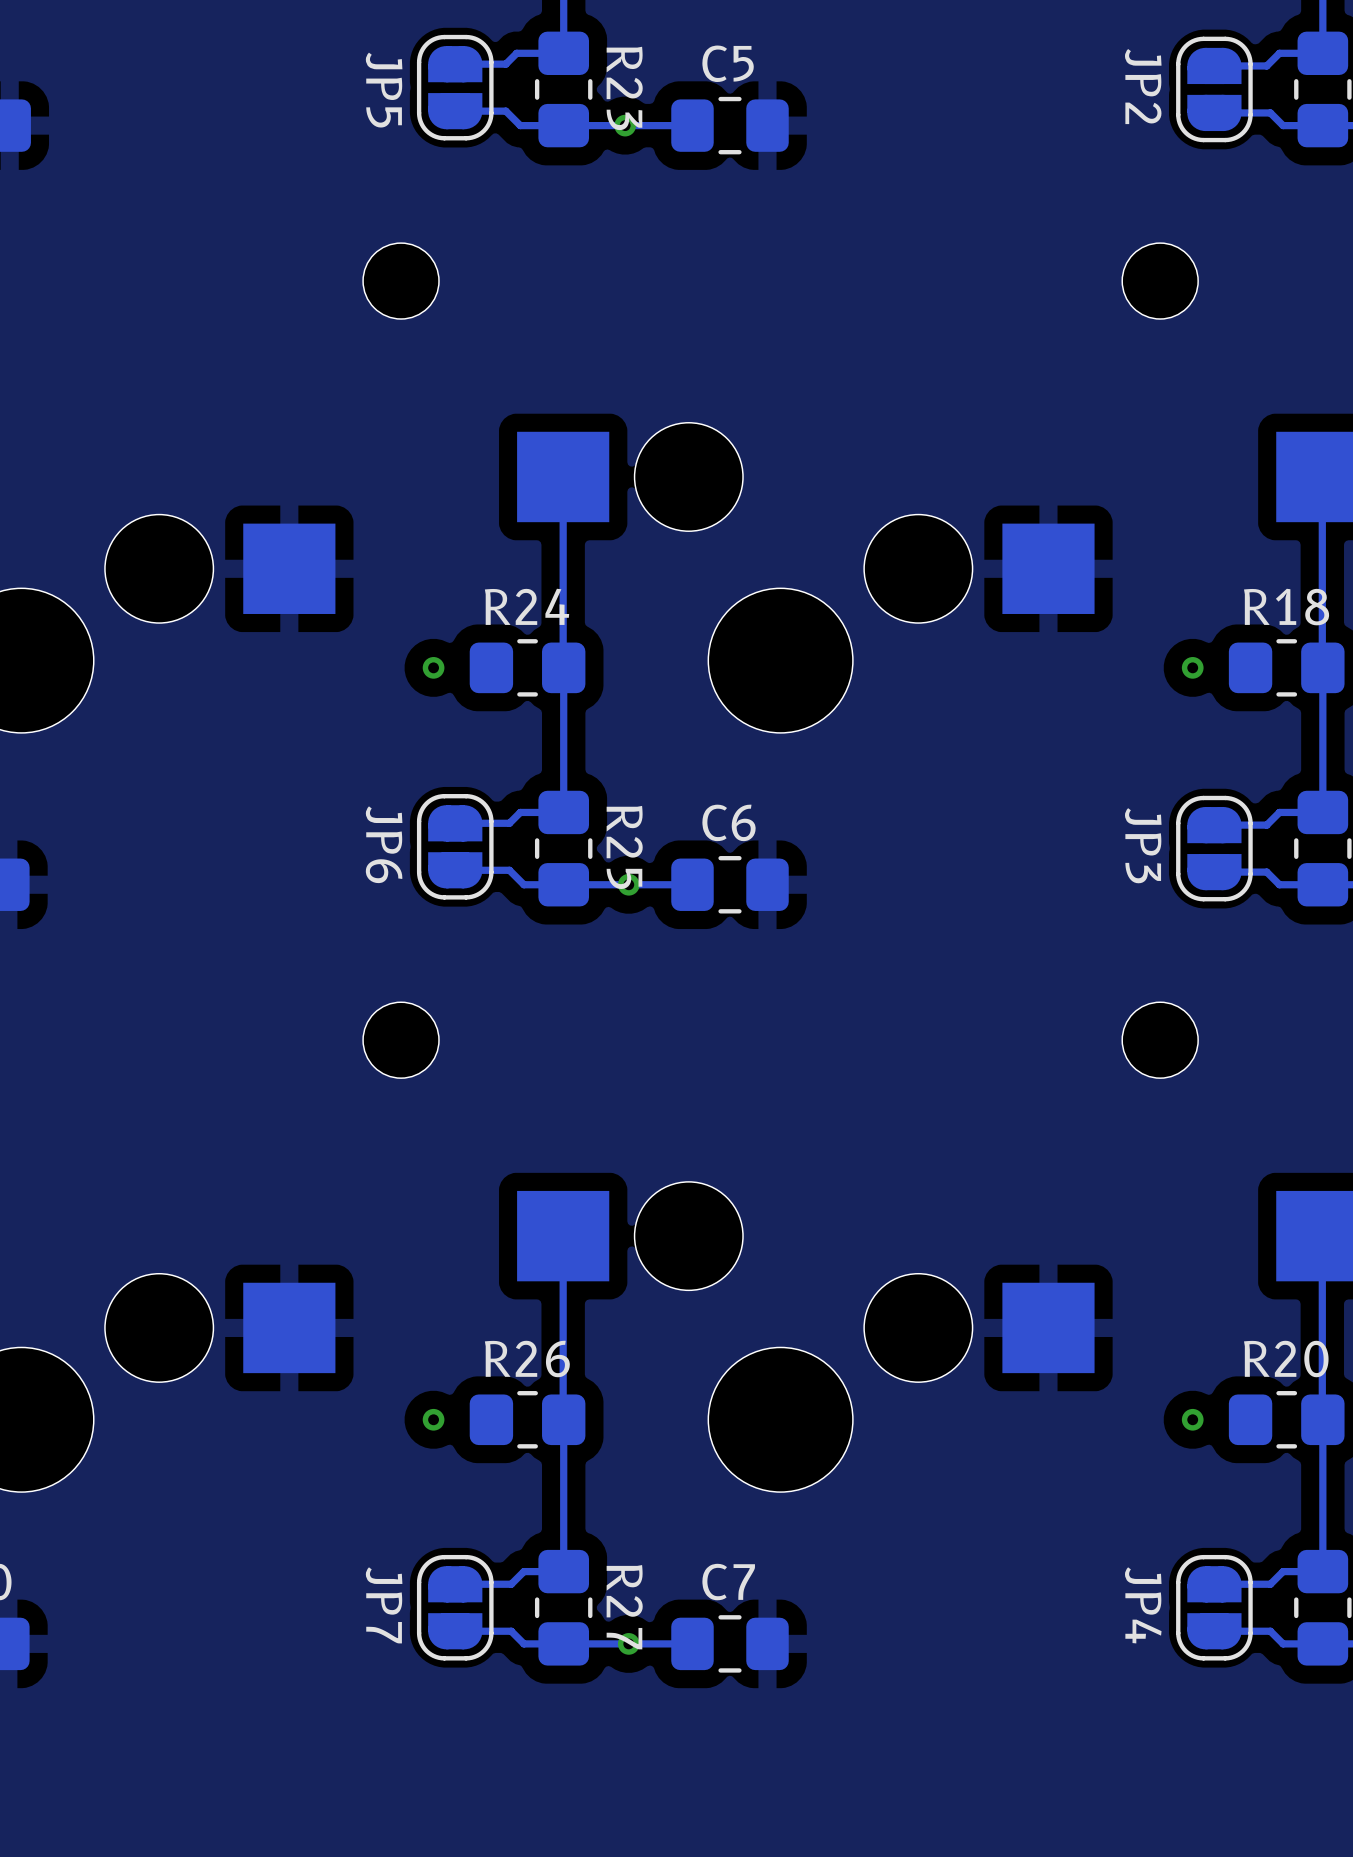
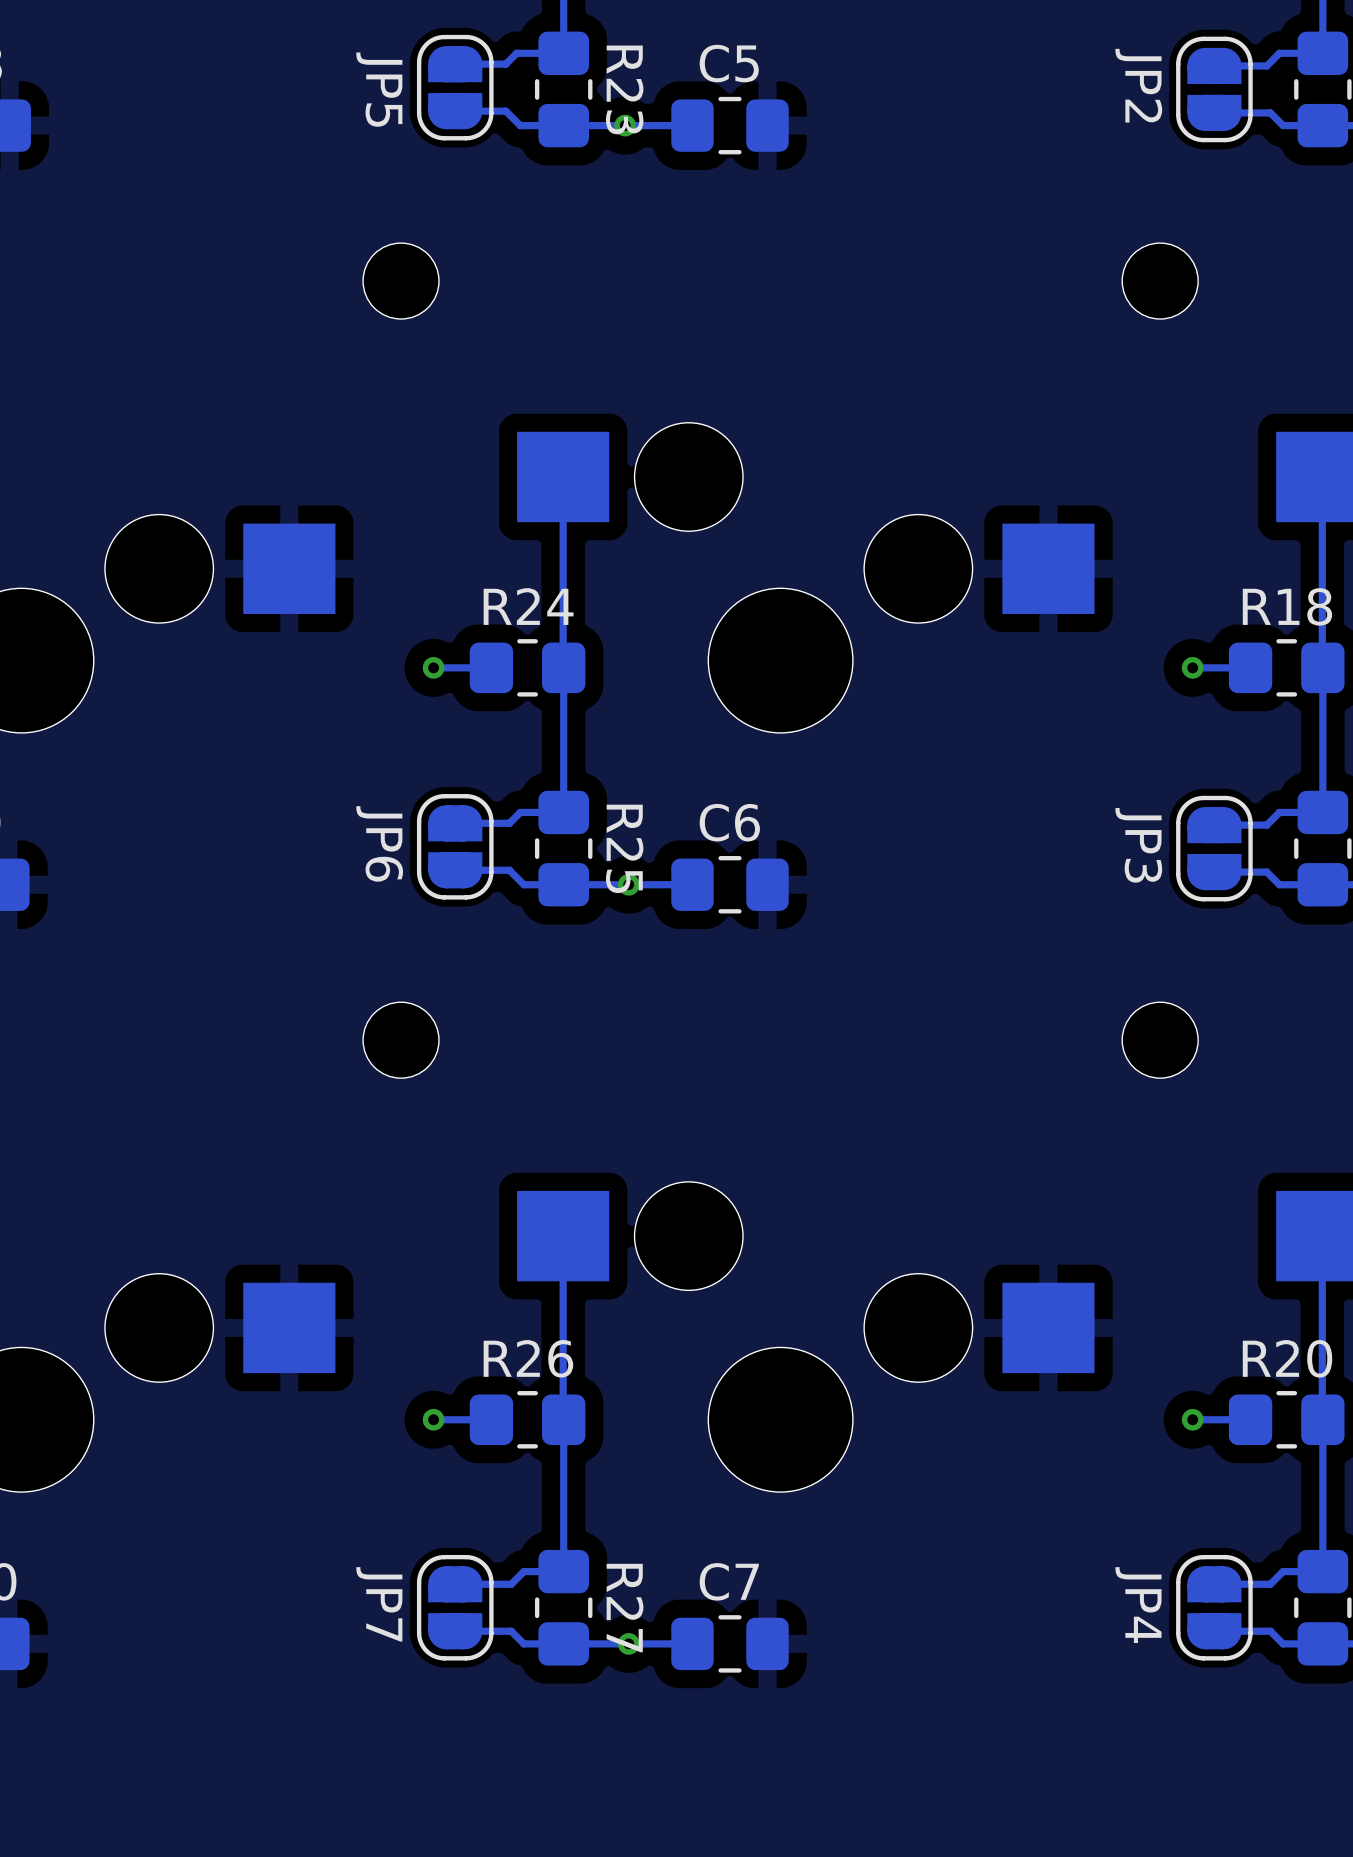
track: none -> (491, 667) (433, 667)
track: none -> (1250, 667) (1192, 667)
track: none -> (491, 1419) (433, 1419)
track: none -> (1250, 1419) (1192, 1419)

